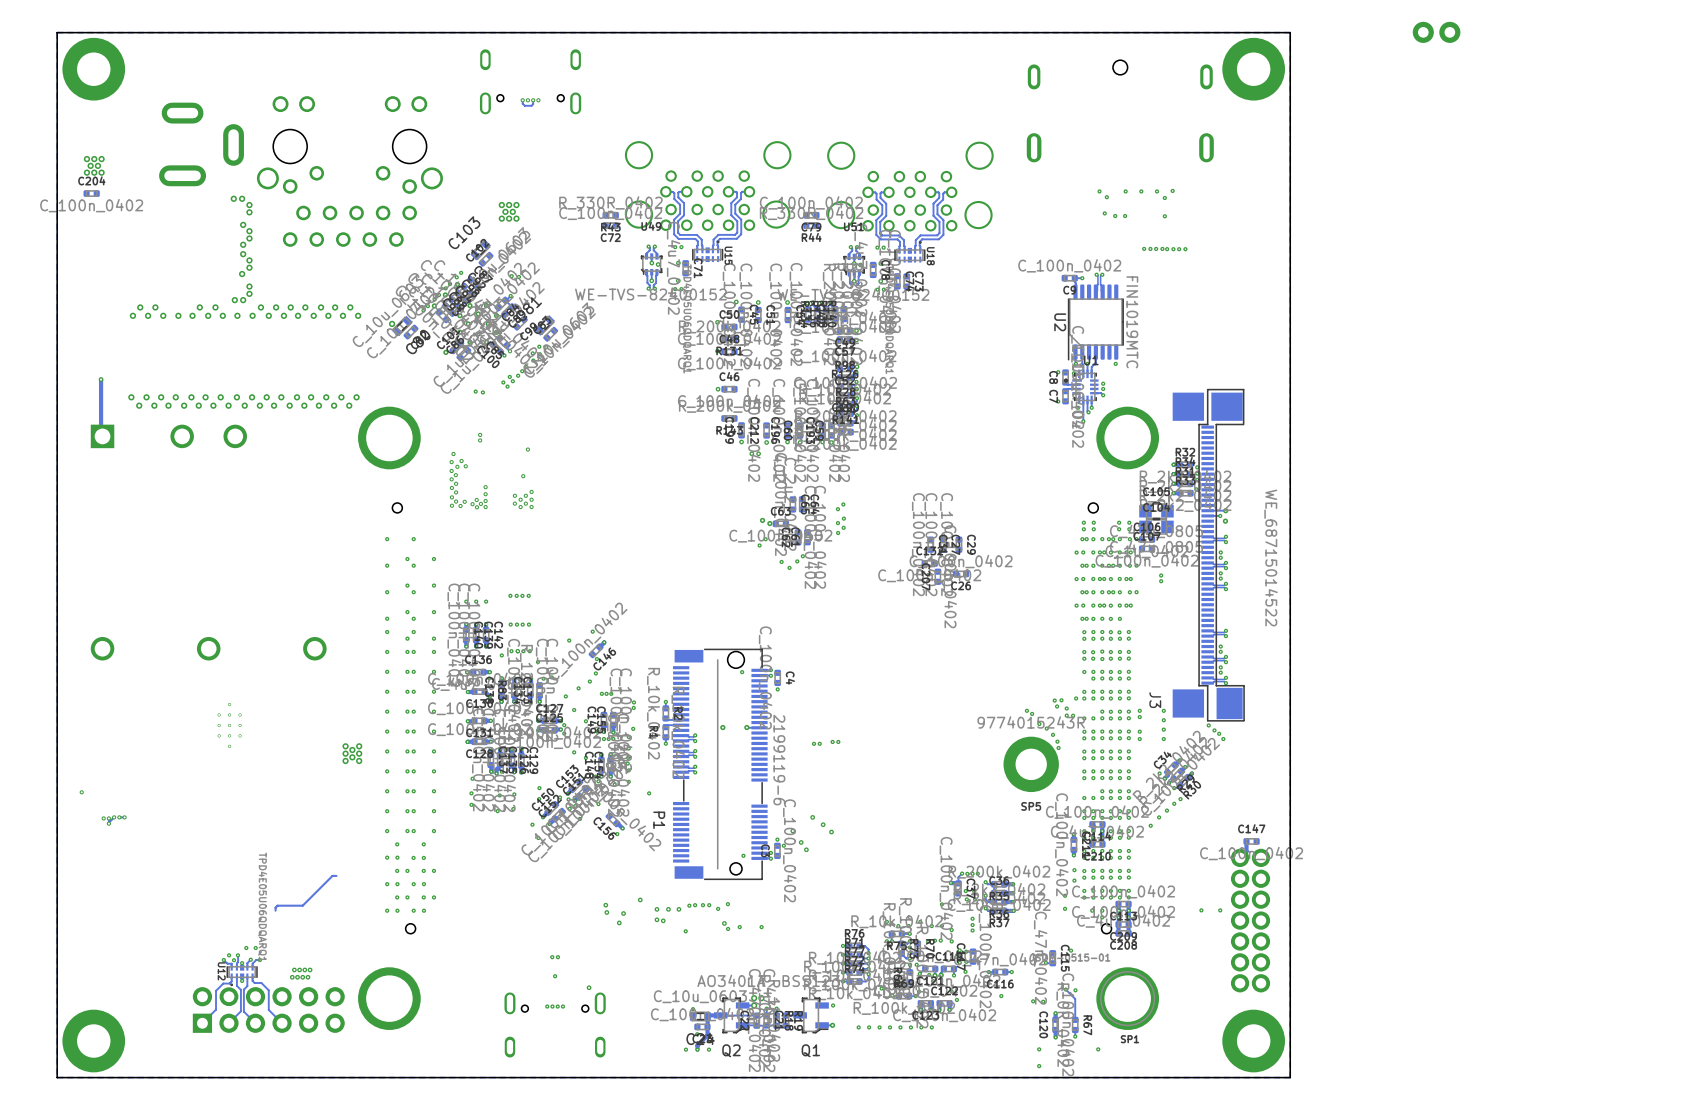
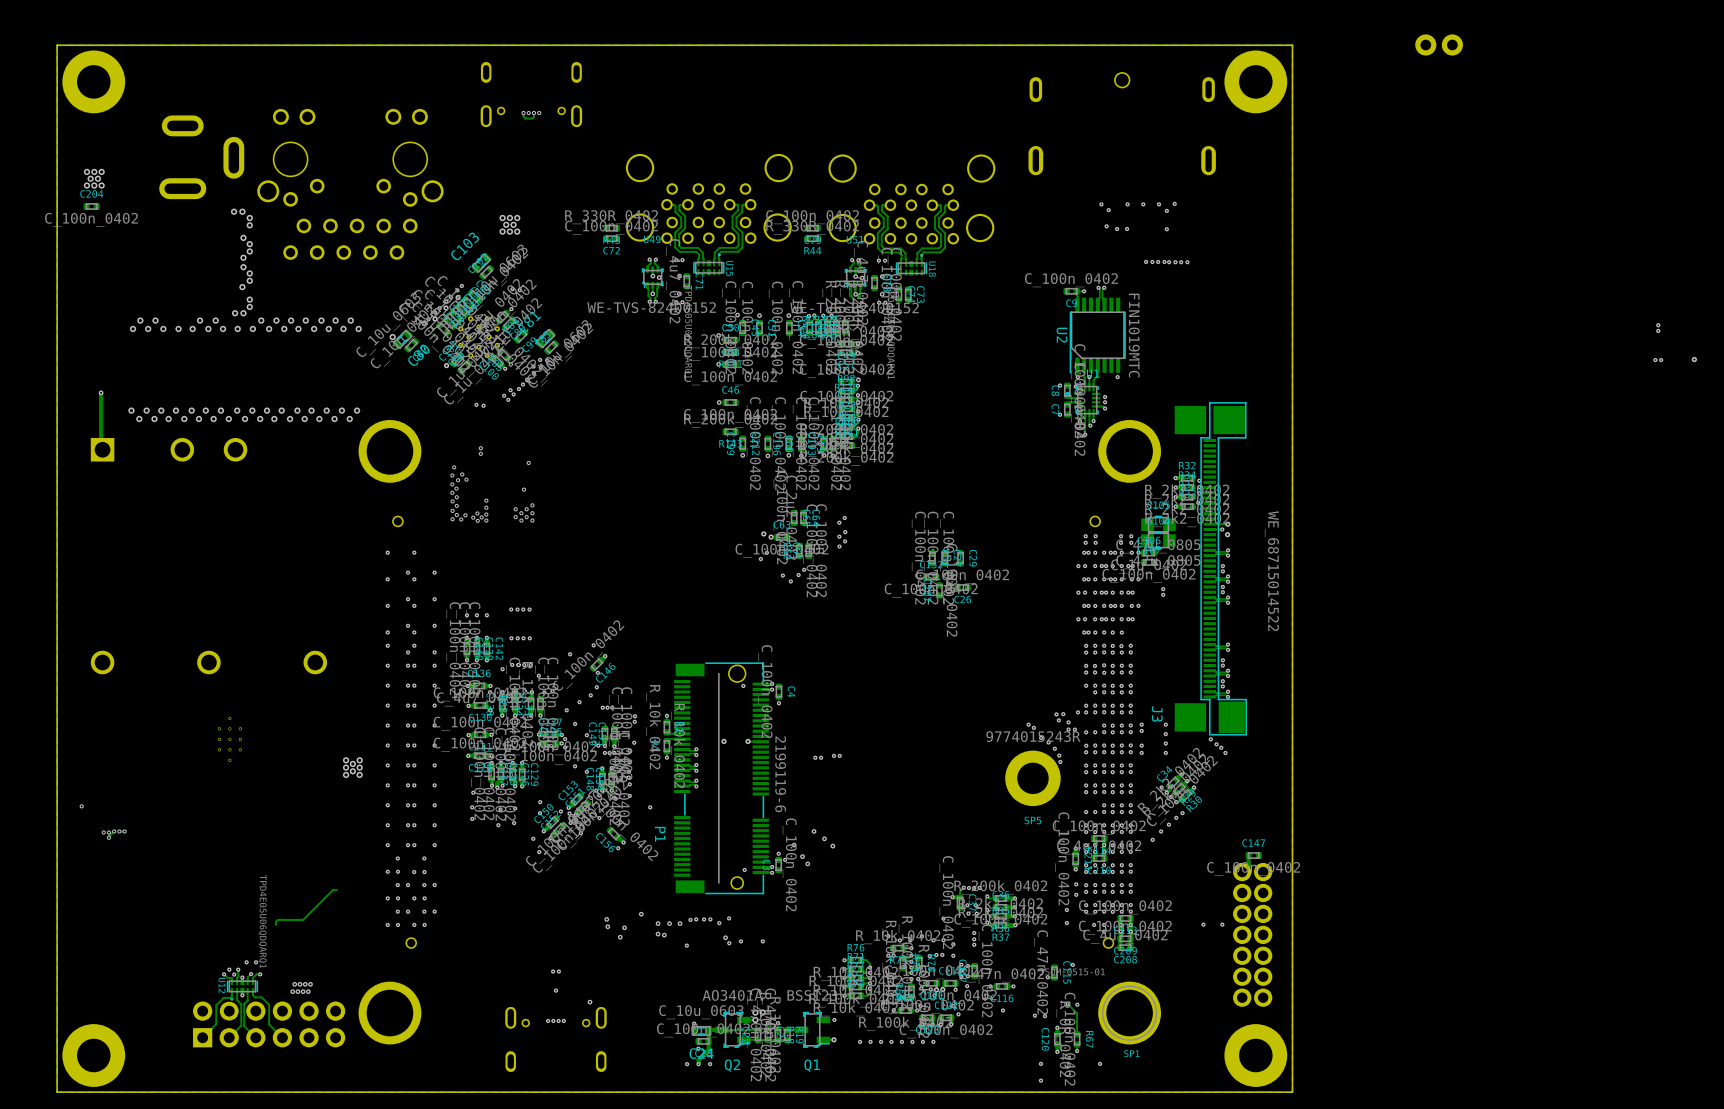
via: none -> (1658, 325)
via: none -> (1658, 330)
via: none -> (1655, 360)
via: none -> (1661, 360)
via: none -> (1694, 359)
via: (751, 453) -> none
via: (758, 453) -> none

